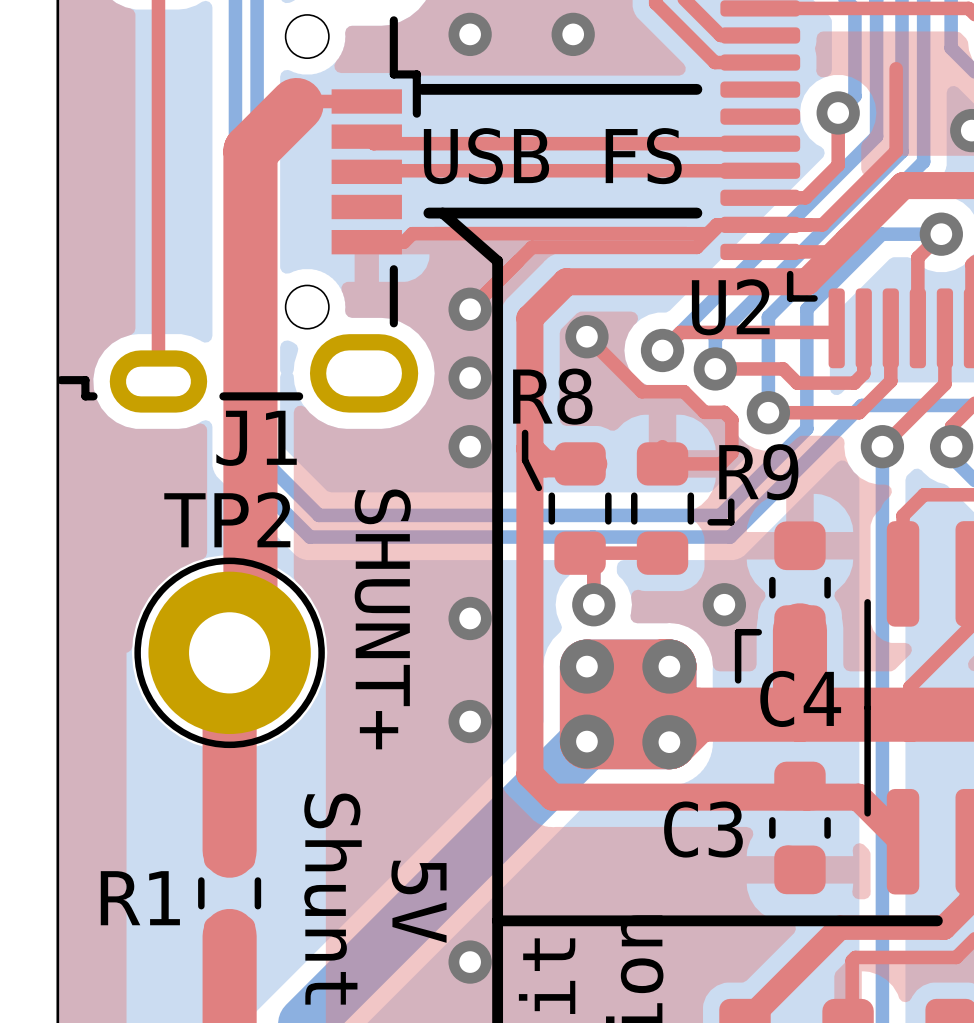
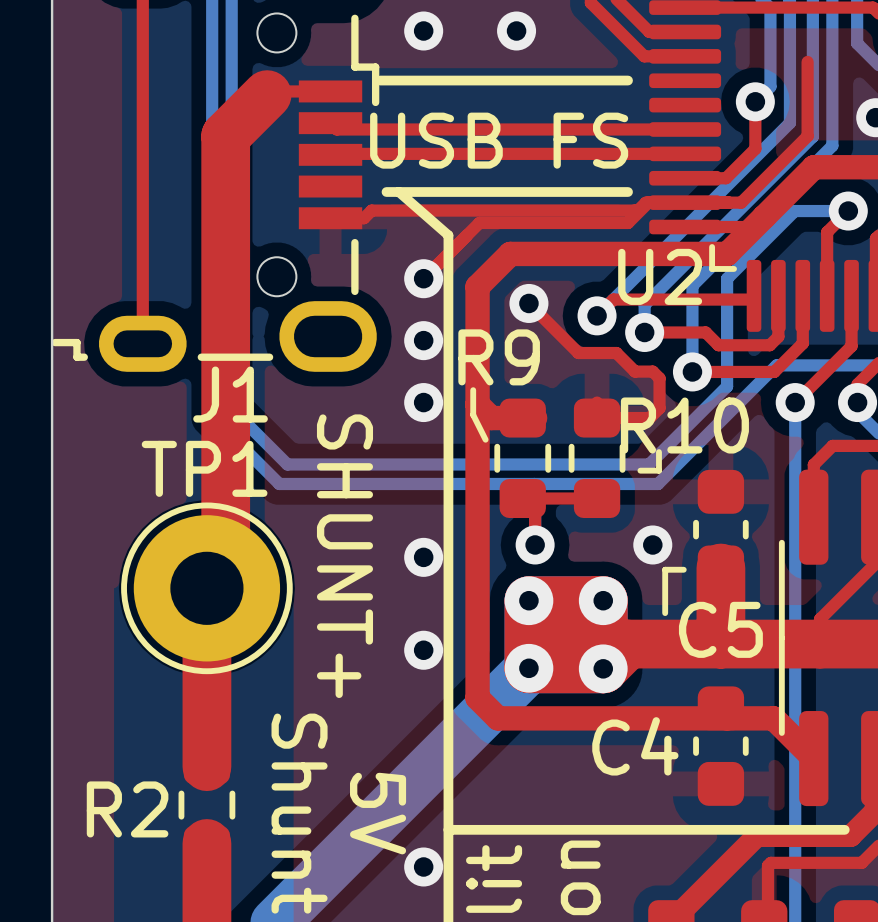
R8 name: R8 (552, 396) -> R9 (499, 357)
R9 name: R9 (758, 472) -> R10 (684, 425)
TP2 name: TP2 (227, 519) -> TP1 (204, 468)
C4 name: C4 (800, 698) -> C5 (720, 629)
C3 name: C3 (703, 829) -> C4 (635, 746)
R1 name: R1 (140, 898) -> R2 (127, 809)

